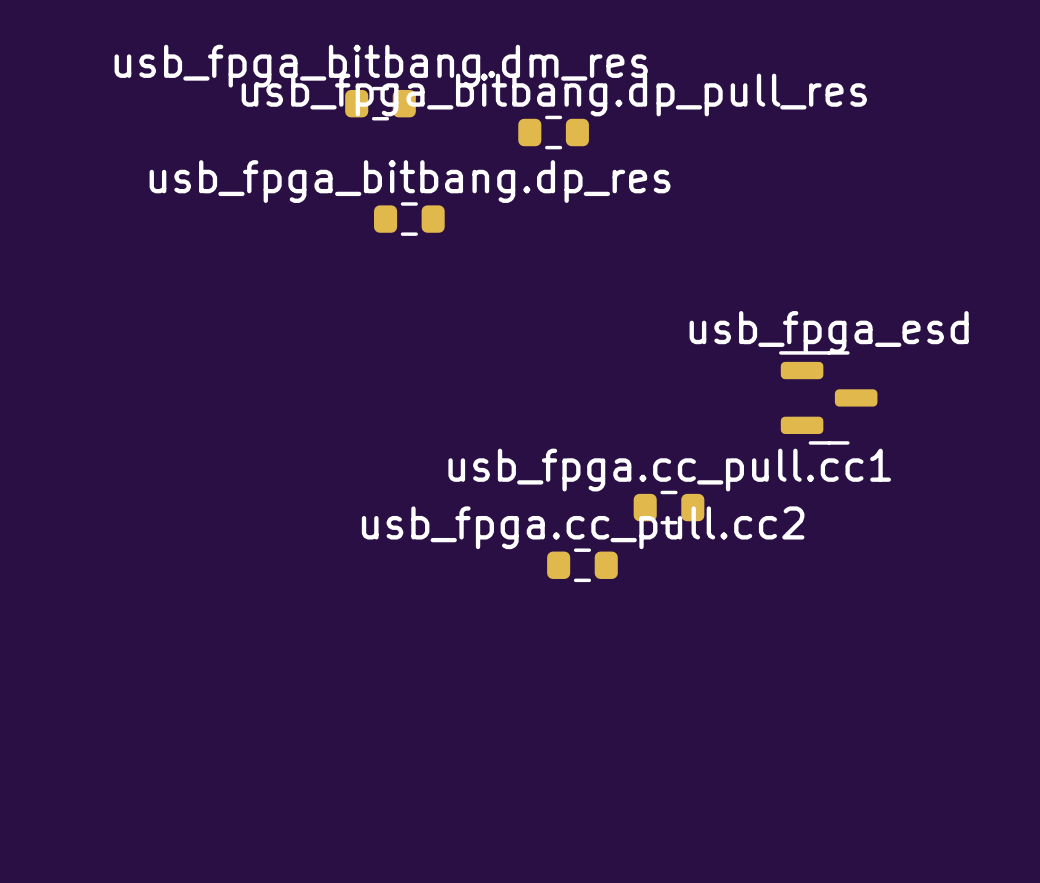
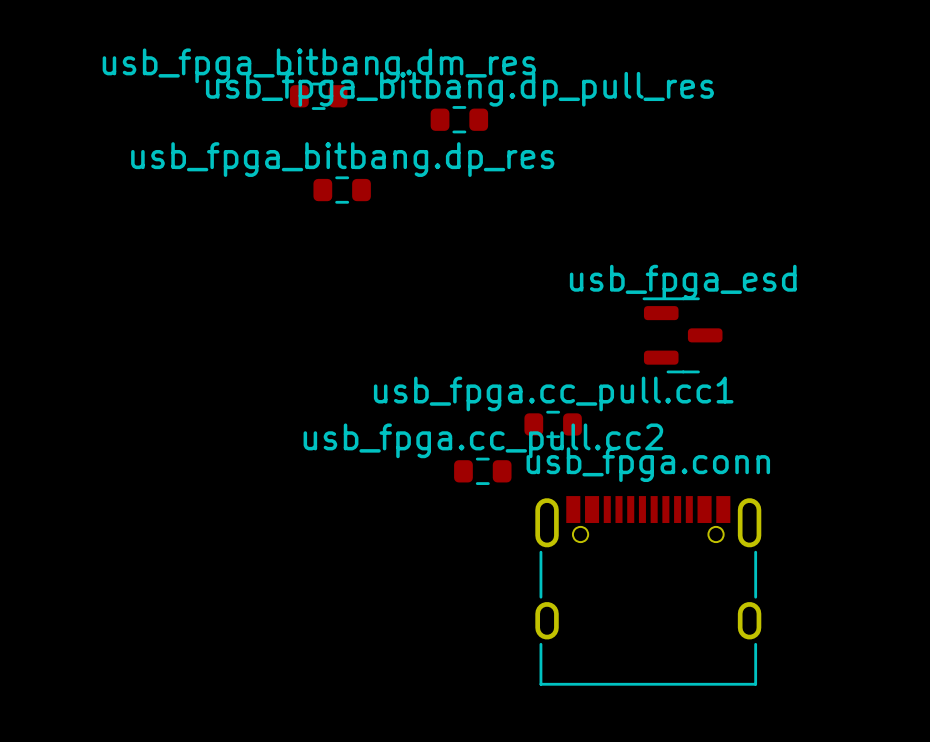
usb_fpga.conn: none -> (648, 590)

